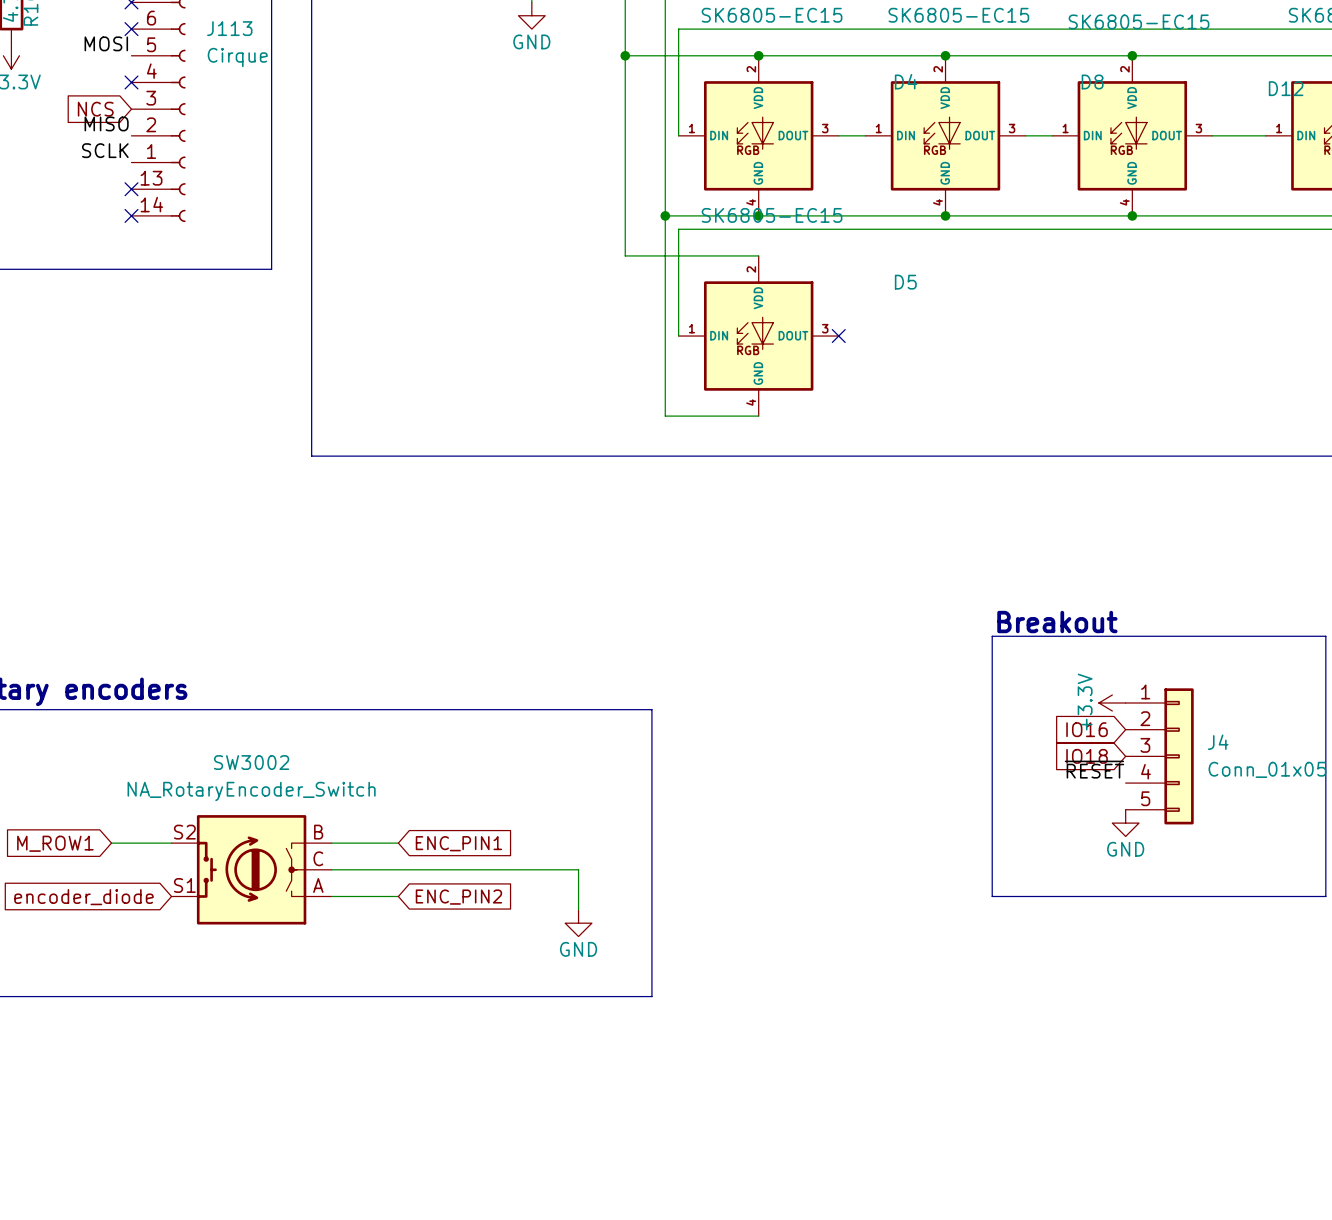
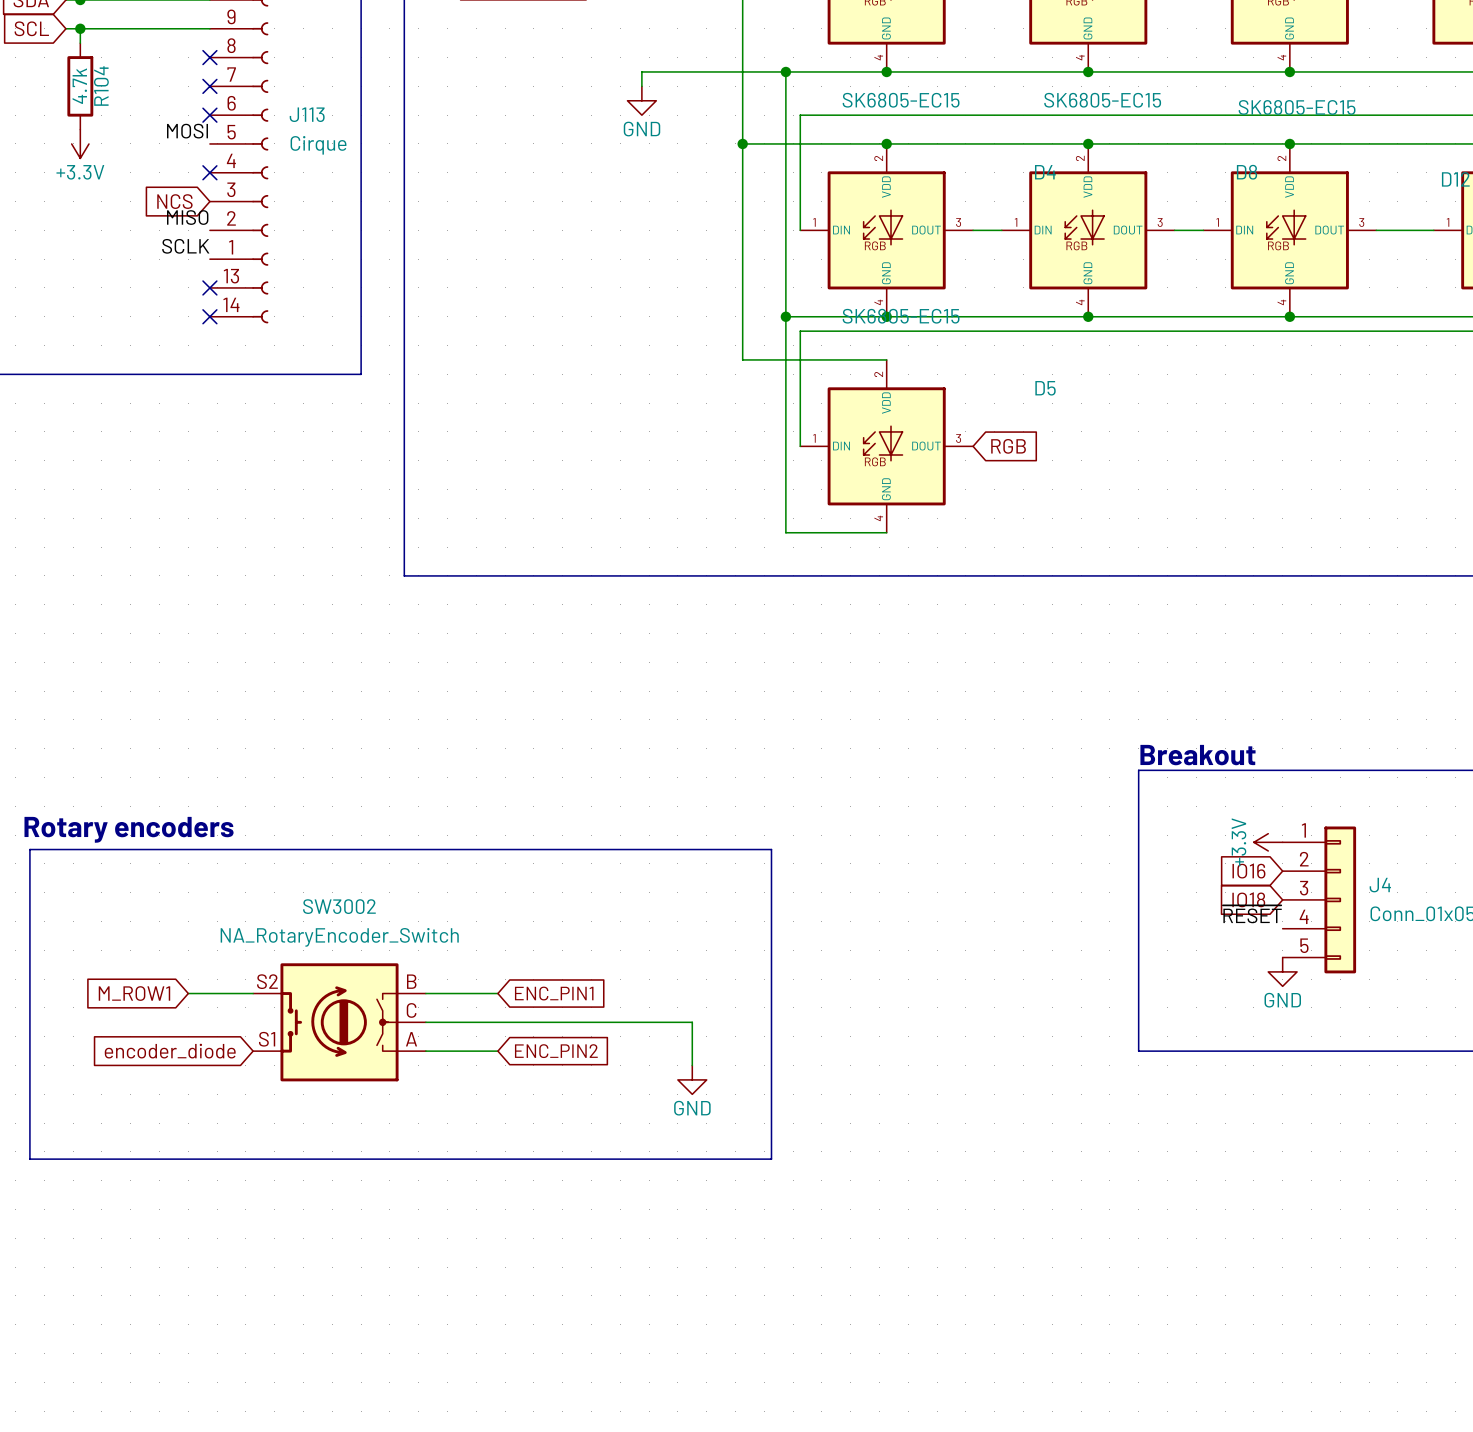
no-connect mark: (838, 336) -> none
global label: none -> RGB (1008, 446)

